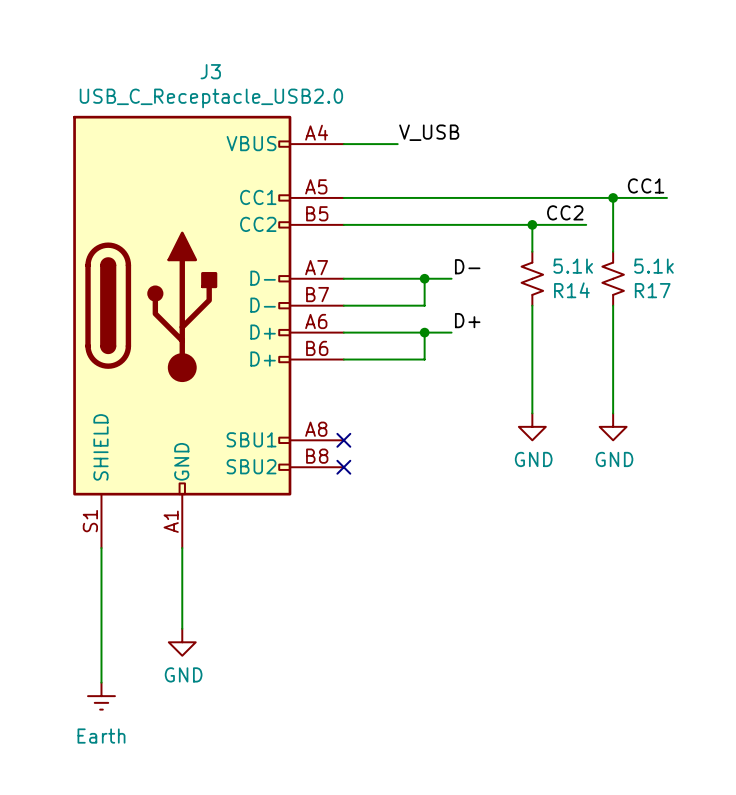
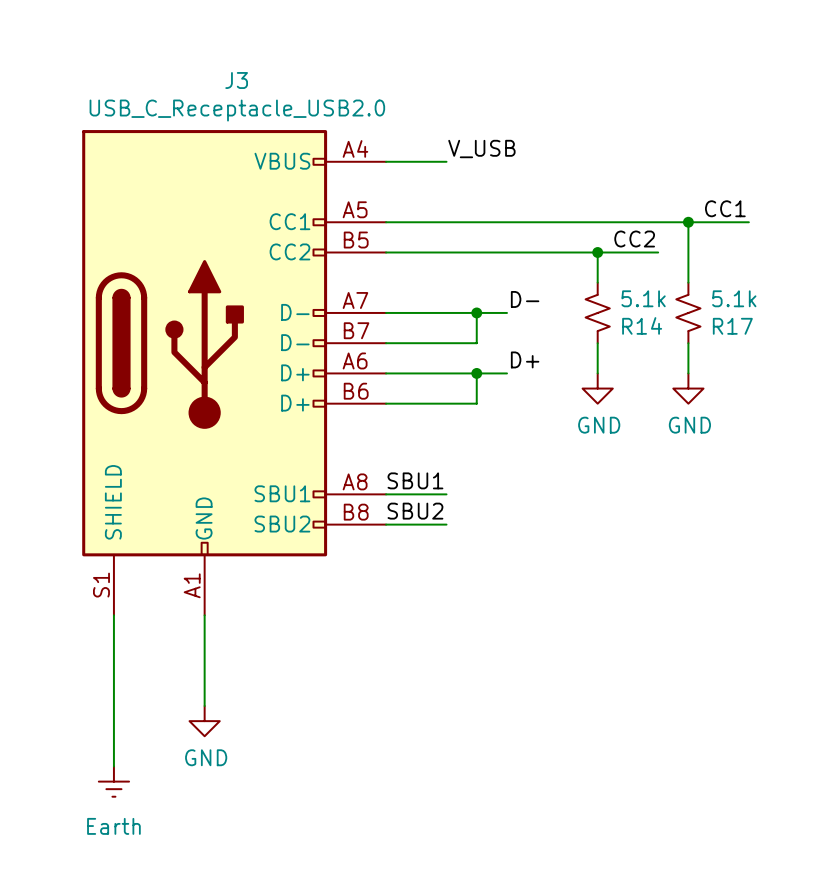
wire: (532, 332) (532, 413) -> none
wire: (613, 332) (613, 413) -> none
power symbol: none -> GND (597, 388)
power symbol: none -> GND (688, 388)
power symbol: GND (532, 426) -> none
power symbol: GND (613, 426) -> none
label: none -> SBU1 (415, 480)
wire: none -> (386, 494) (446, 494)
no-connect mark: (343, 440) -> none
label: none -> SBU2 (415, 511)
wire: none -> (386, 524) (446, 524)
no-connect mark: (343, 467) -> none

